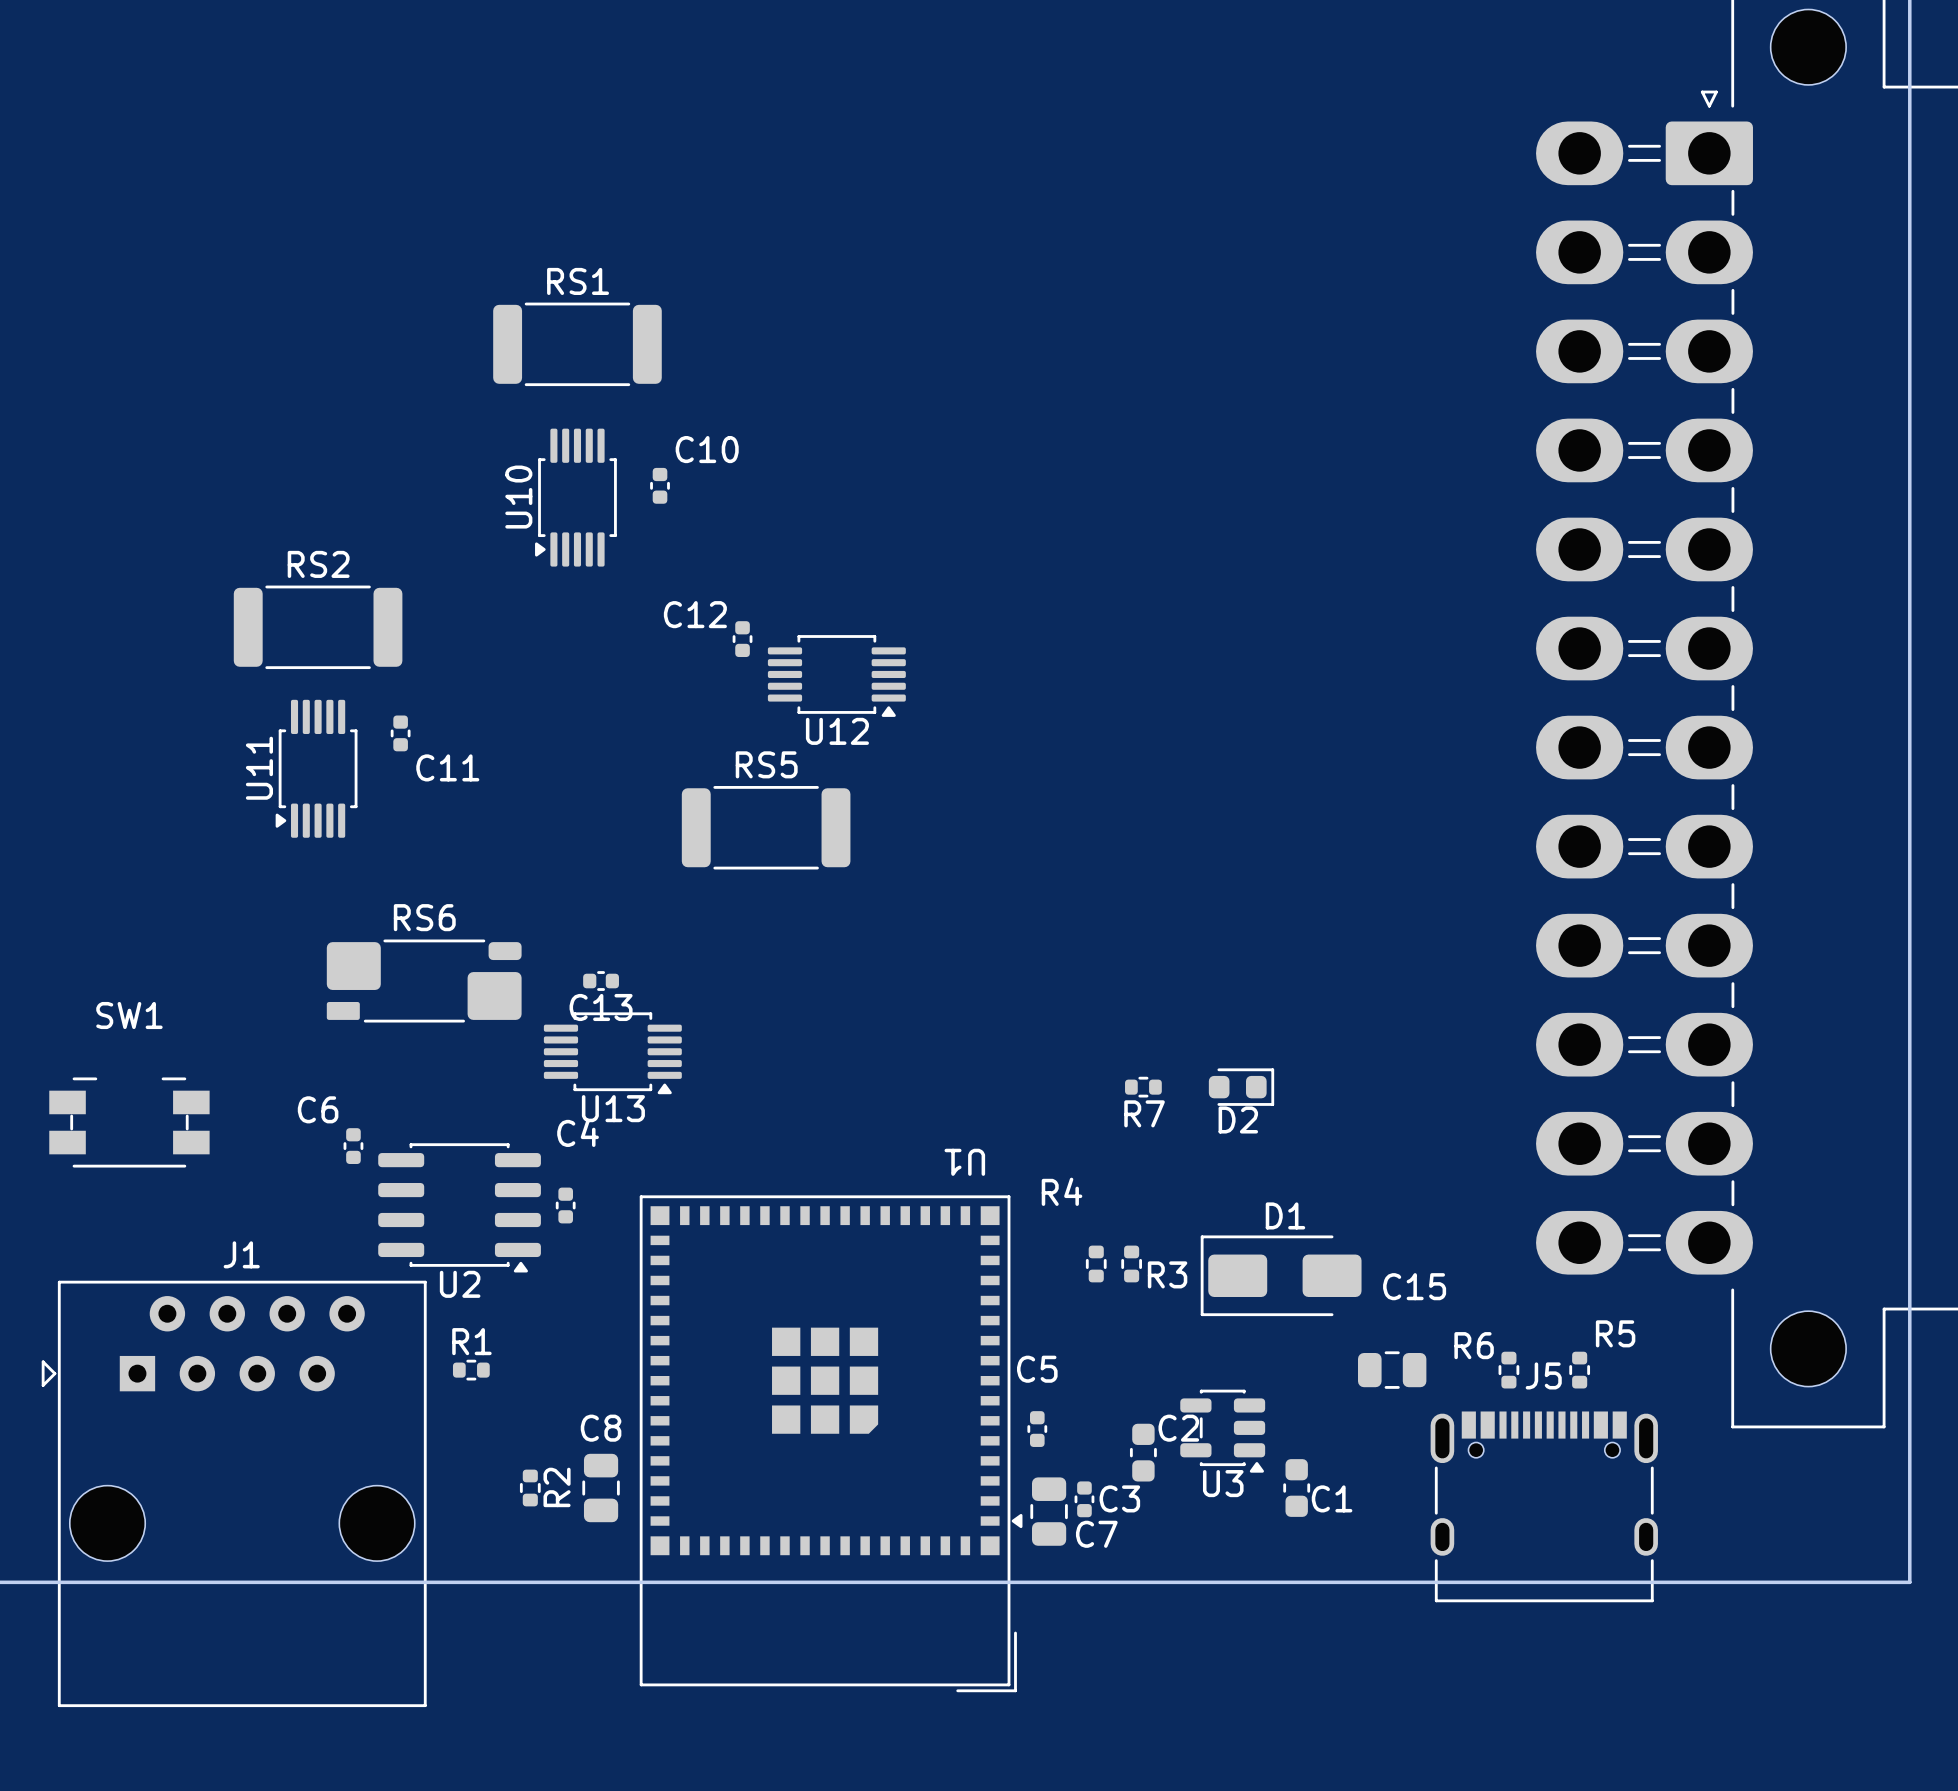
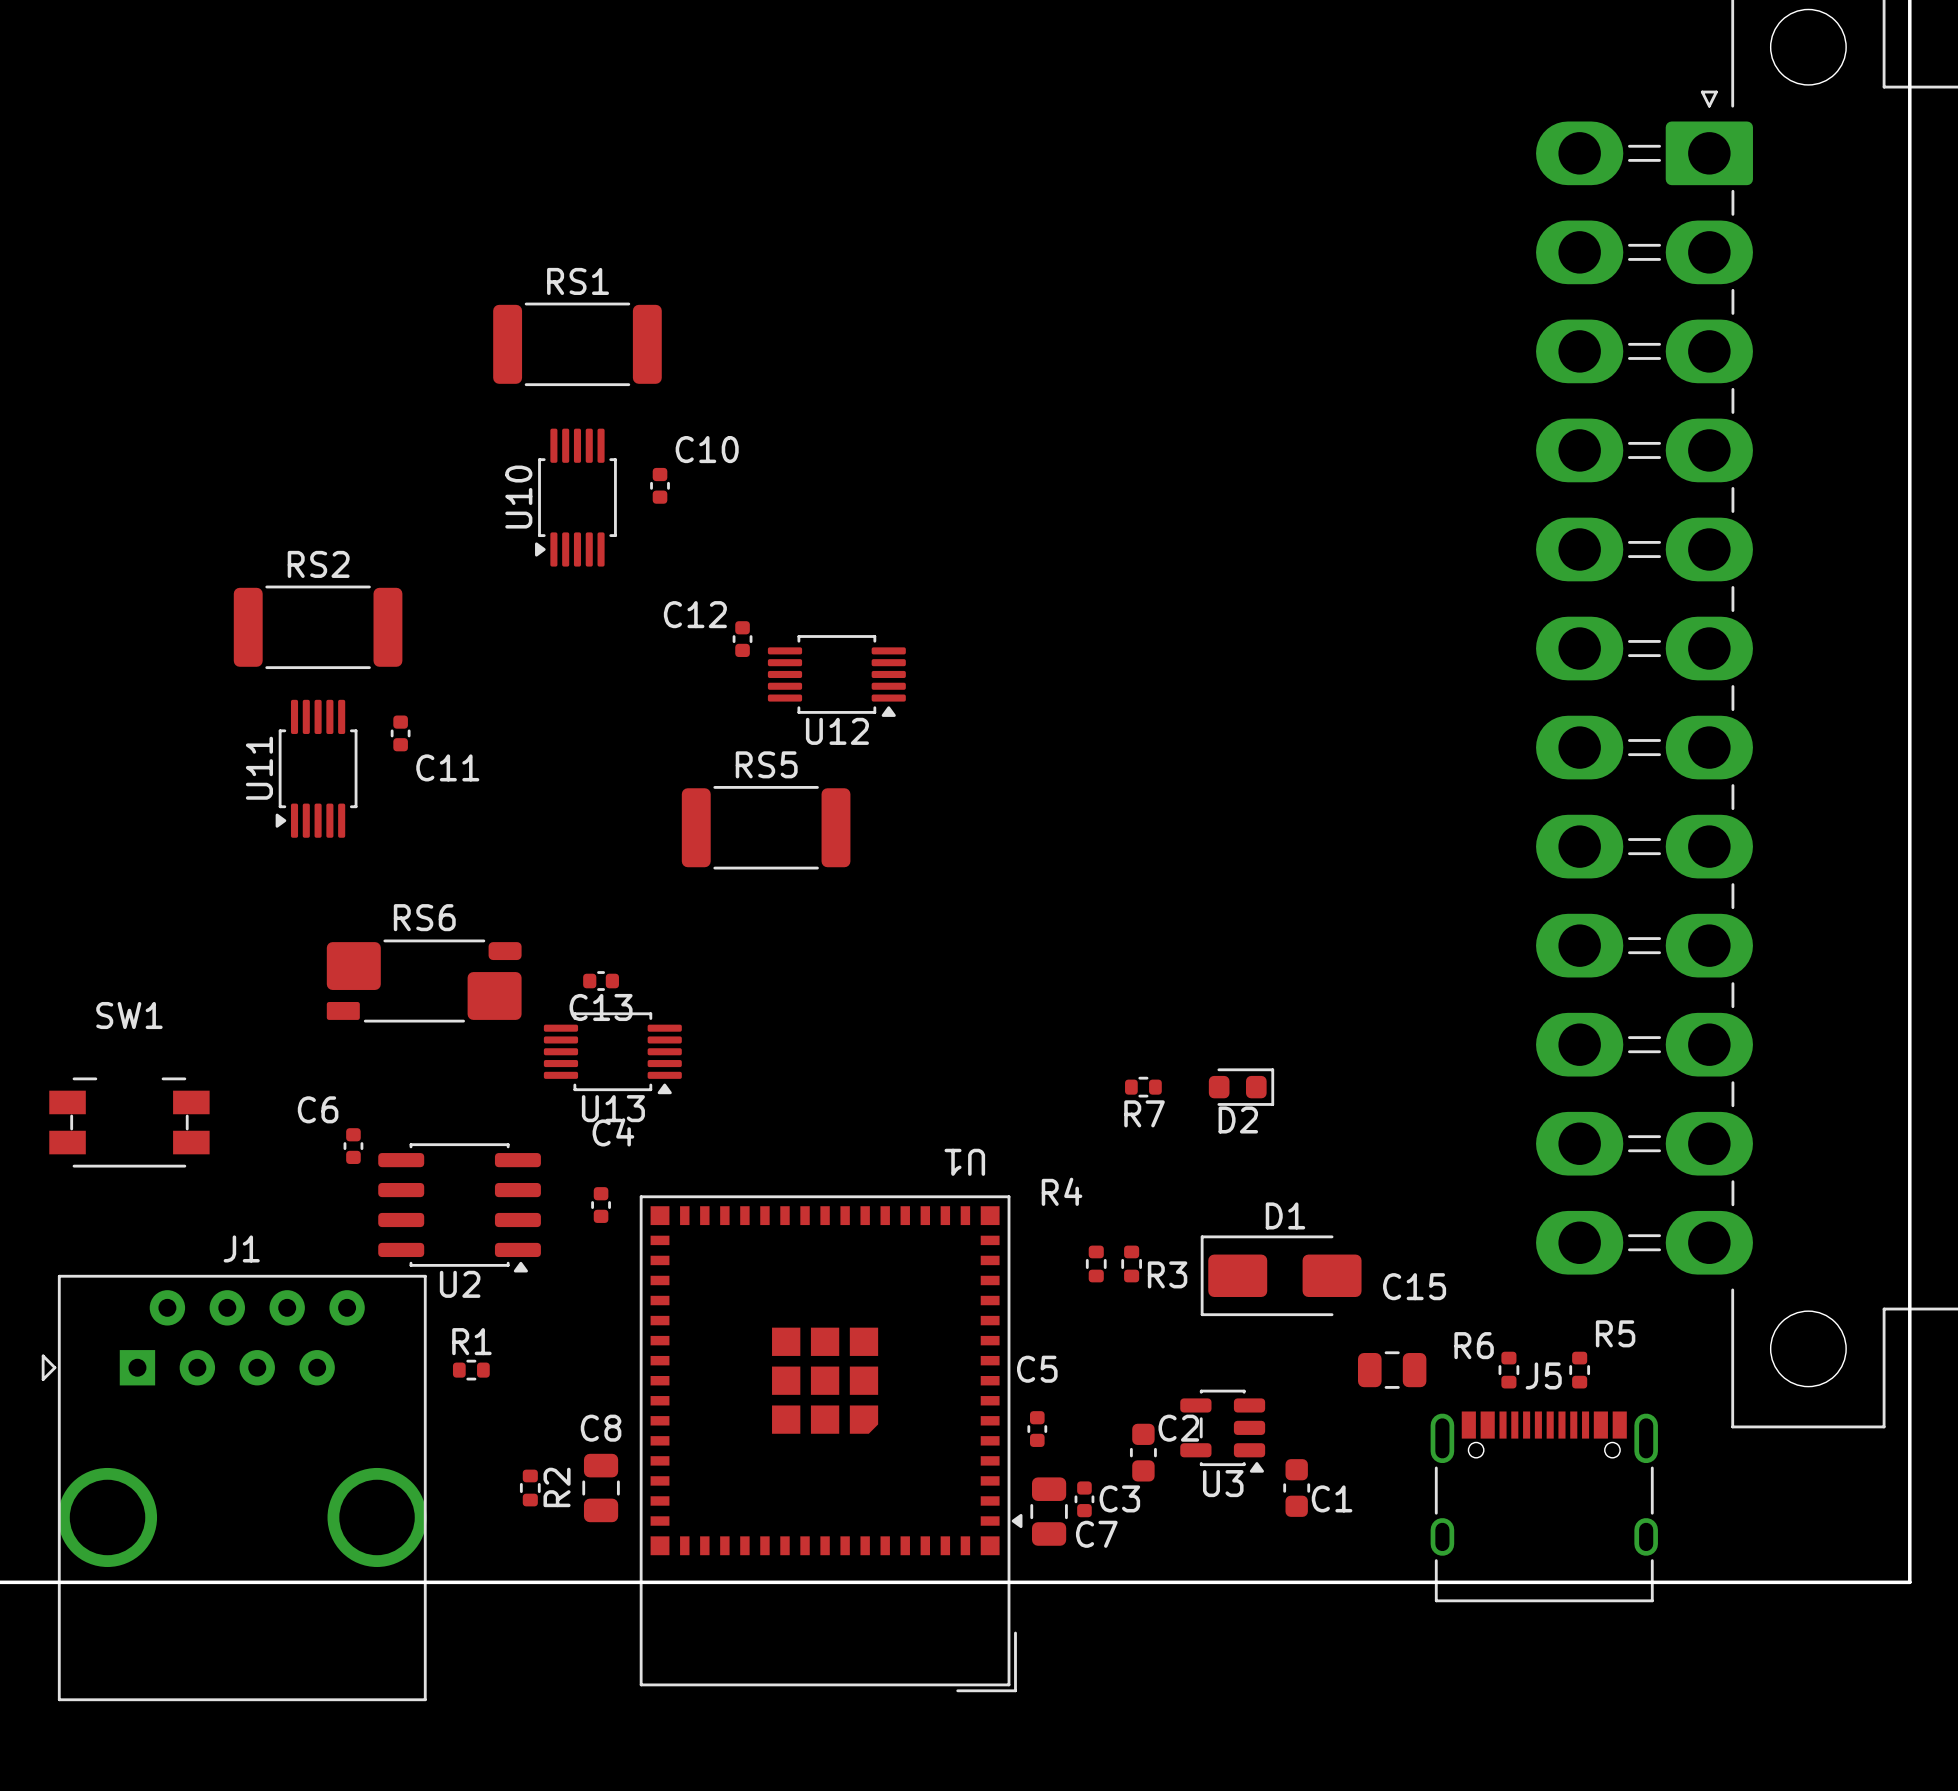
C4 position: (565, 1205) -> (601, 1205)
J1 footprint: [41, 1280, 427, 1708] -> [41, 1274, 427, 1702]

